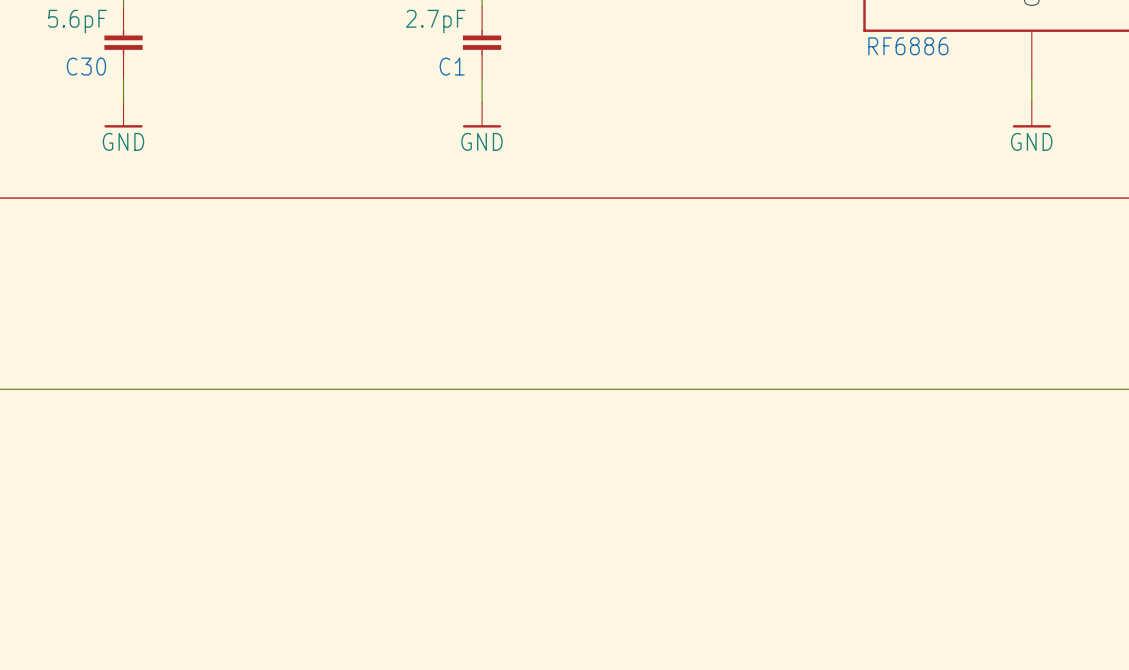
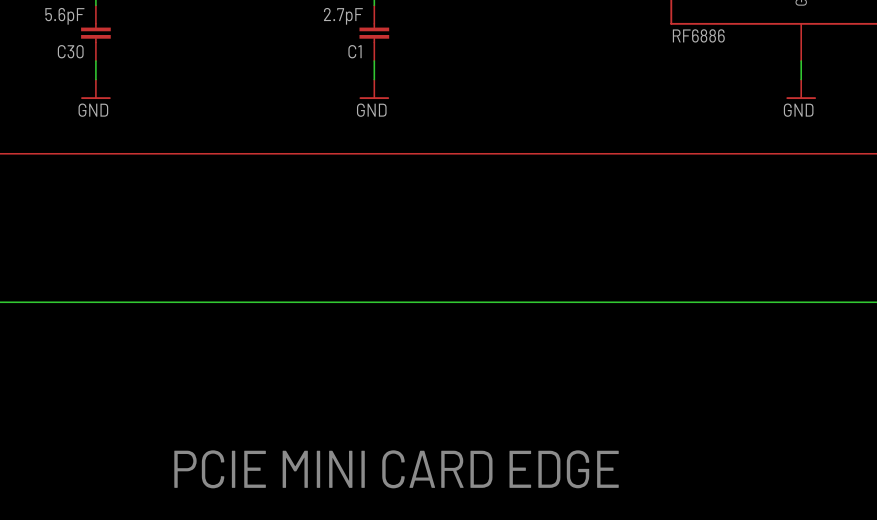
text: none -> PCIE MINI CARD EDGE (396, 469)

